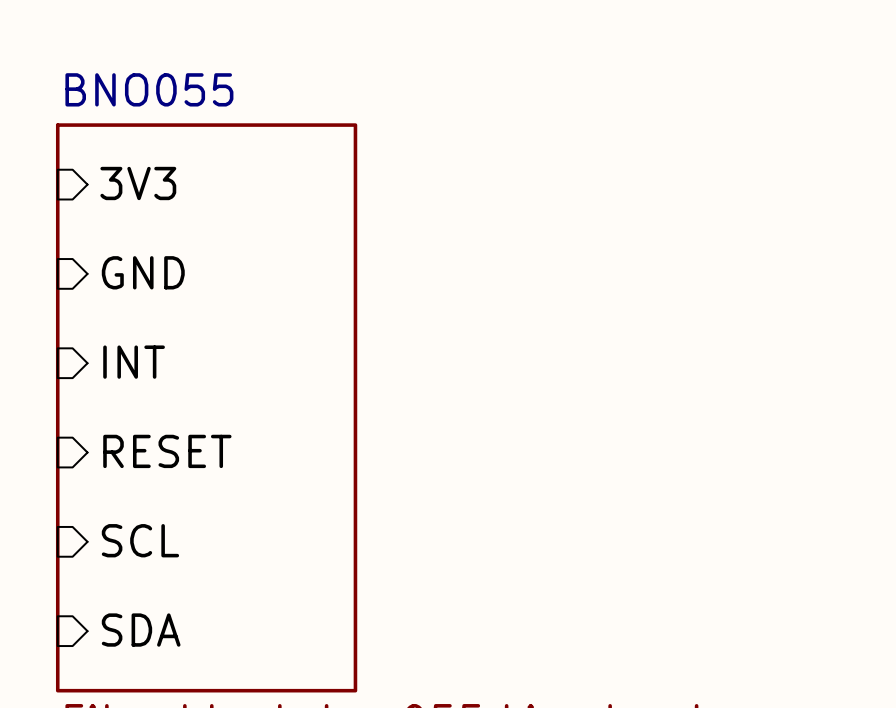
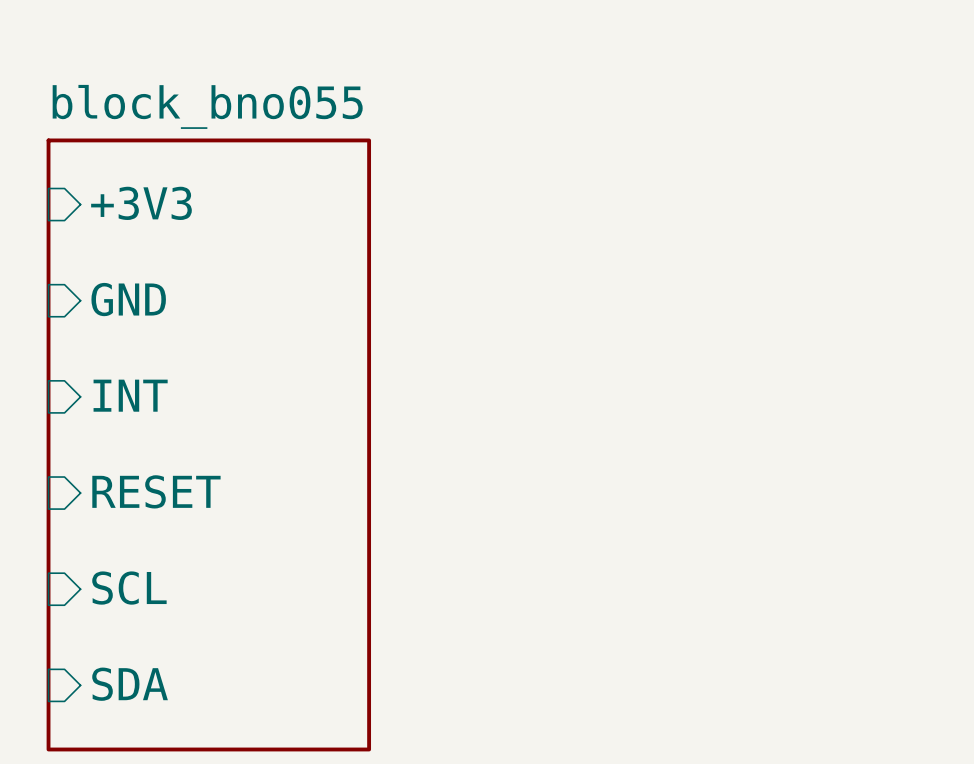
sheet BNO055 name: BNO055 (149, 89) -> block_bno055 (207, 106)
sheet pin: 3V3 (138, 183) -> +3V3 (141, 203)

